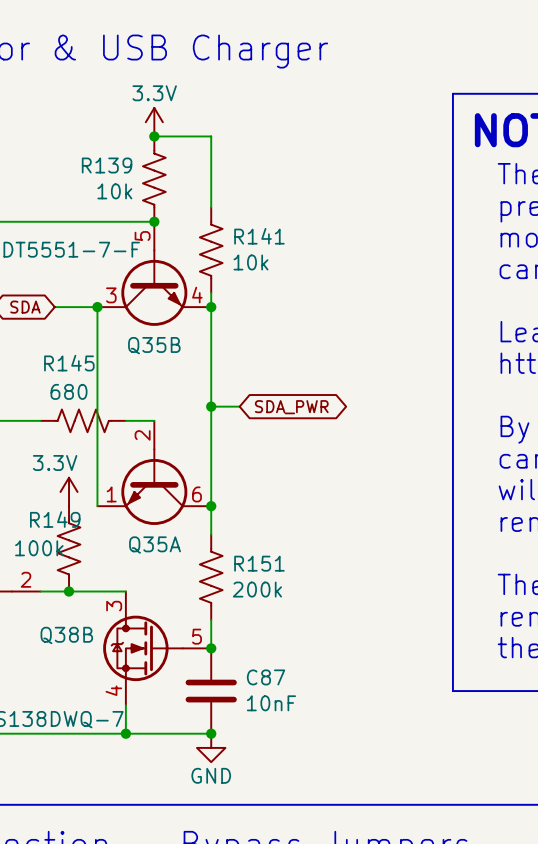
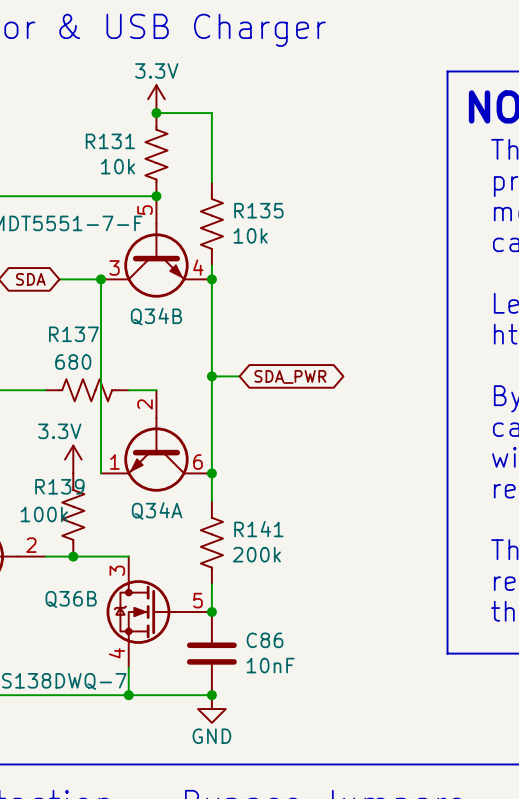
R139 name: R139 (107, 165) -> R131 (110, 141)
R141 name: R141 (259, 236) -> R135 (258, 210)
Q35B name: Q35B (154, 345) -> Q34B (156, 316)
R145 name: R145 (69, 363) -> R137 (73, 334)
R149 name: R149 (55, 519) -> R139 (59, 486)
Q35A name: Q35A (155, 545) -> Q34A (157, 510)
R151 name: R151 (259, 563) -> R141 (258, 529)
Q38B name: Q38B (66, 635) -> Q36B (71, 599)
C87 name: C87 (266, 677) -> C86 (265, 640)

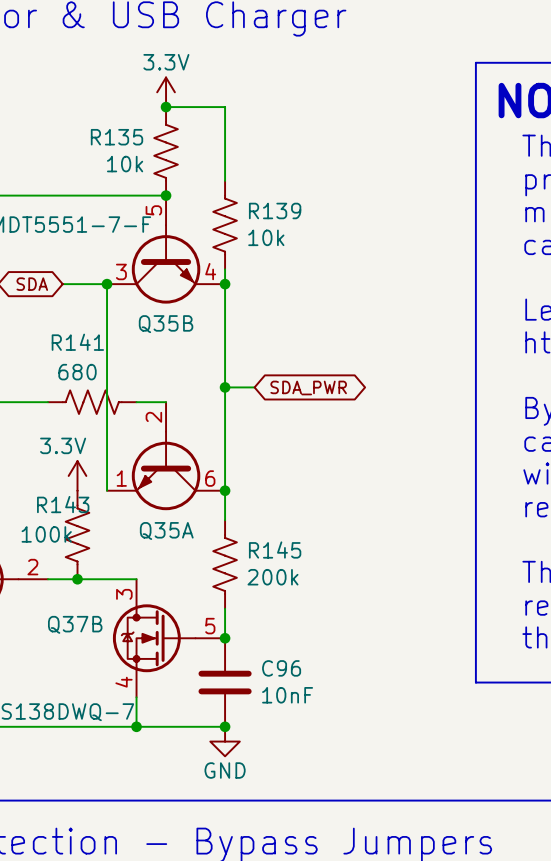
R131 name: R131 (110, 141) -> R135 (117, 137)
R135 name: R135 (258, 210) -> R139 (275, 210)
Q34B name: Q34B (156, 316) -> Q35B (166, 324)
R137 name: R137 (73, 334) -> R141 (77, 342)
R139 name: R139 (59, 486) -> R143 (63, 504)
Q34A name: Q34A (157, 510) -> Q35A (166, 531)
R141 name: R141 (258, 529) -> R145 (275, 550)
Q36B name: Q36B (71, 599) -> Q37B (75, 624)
C86 name: C86 (265, 640) -> C96 (281, 668)

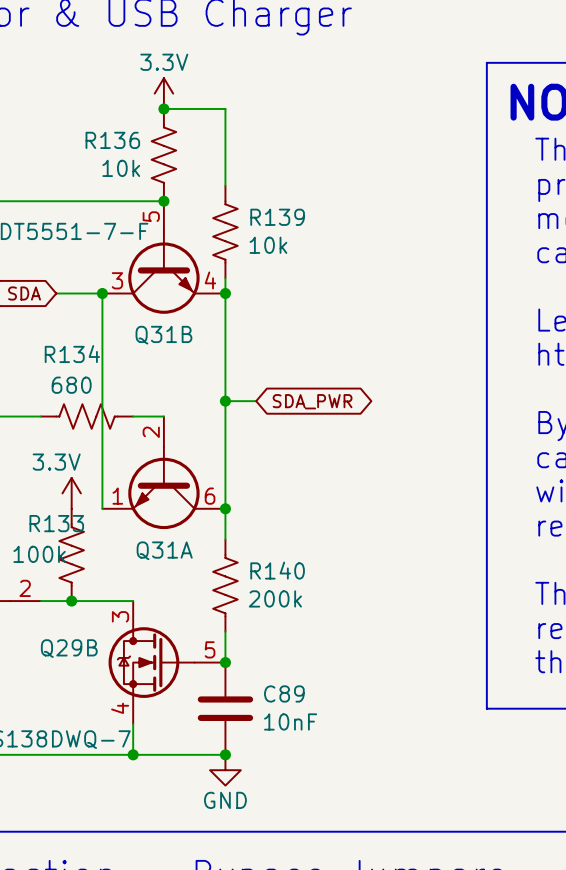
R135 name: R135 (117, 137) -> R136 (112, 140)
Q35B name: Q35B (166, 324) -> Q31B (163, 335)
R141 name: R141 (77, 342) -> R134 (72, 354)
R143 name: R143 (63, 504) -> R133 (56, 523)
Q35A name: Q35A (166, 531) -> Q31A (164, 550)
R145 name: R145 (275, 550) -> R140 (277, 570)
Q37B name: Q37B (75, 624) -> Q29B (69, 648)
C96 name: C96 (281, 668) -> C89 (284, 693)

